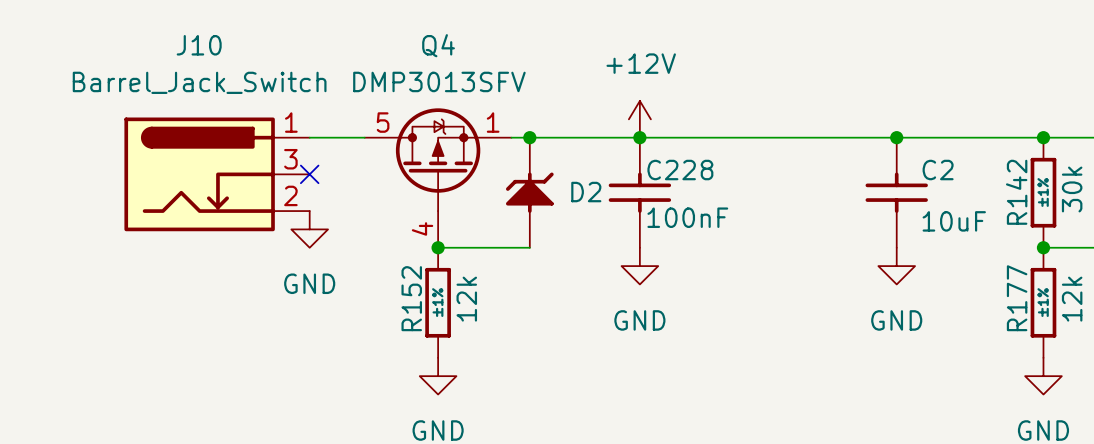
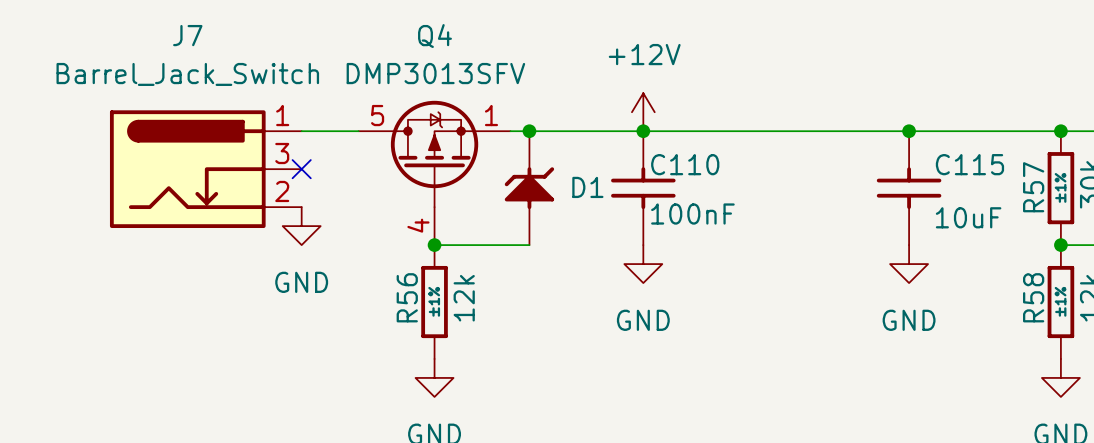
J10 name: J10 (199, 45) -> J7 (187, 35)
C228 name: C228 (680, 170) -> C110 (685, 164)
C2 name: C2 (938, 170) -> C115 (969, 164)
D2 name: D2 (586, 192) -> D1 (587, 187)
R142 name: R142 (1016, 192) -> R57 (1033, 187)
R152 name: R152 (411, 298) -> R56 (407, 297)
R177 name: R177 (1017, 298) -> R58 (1033, 297)

